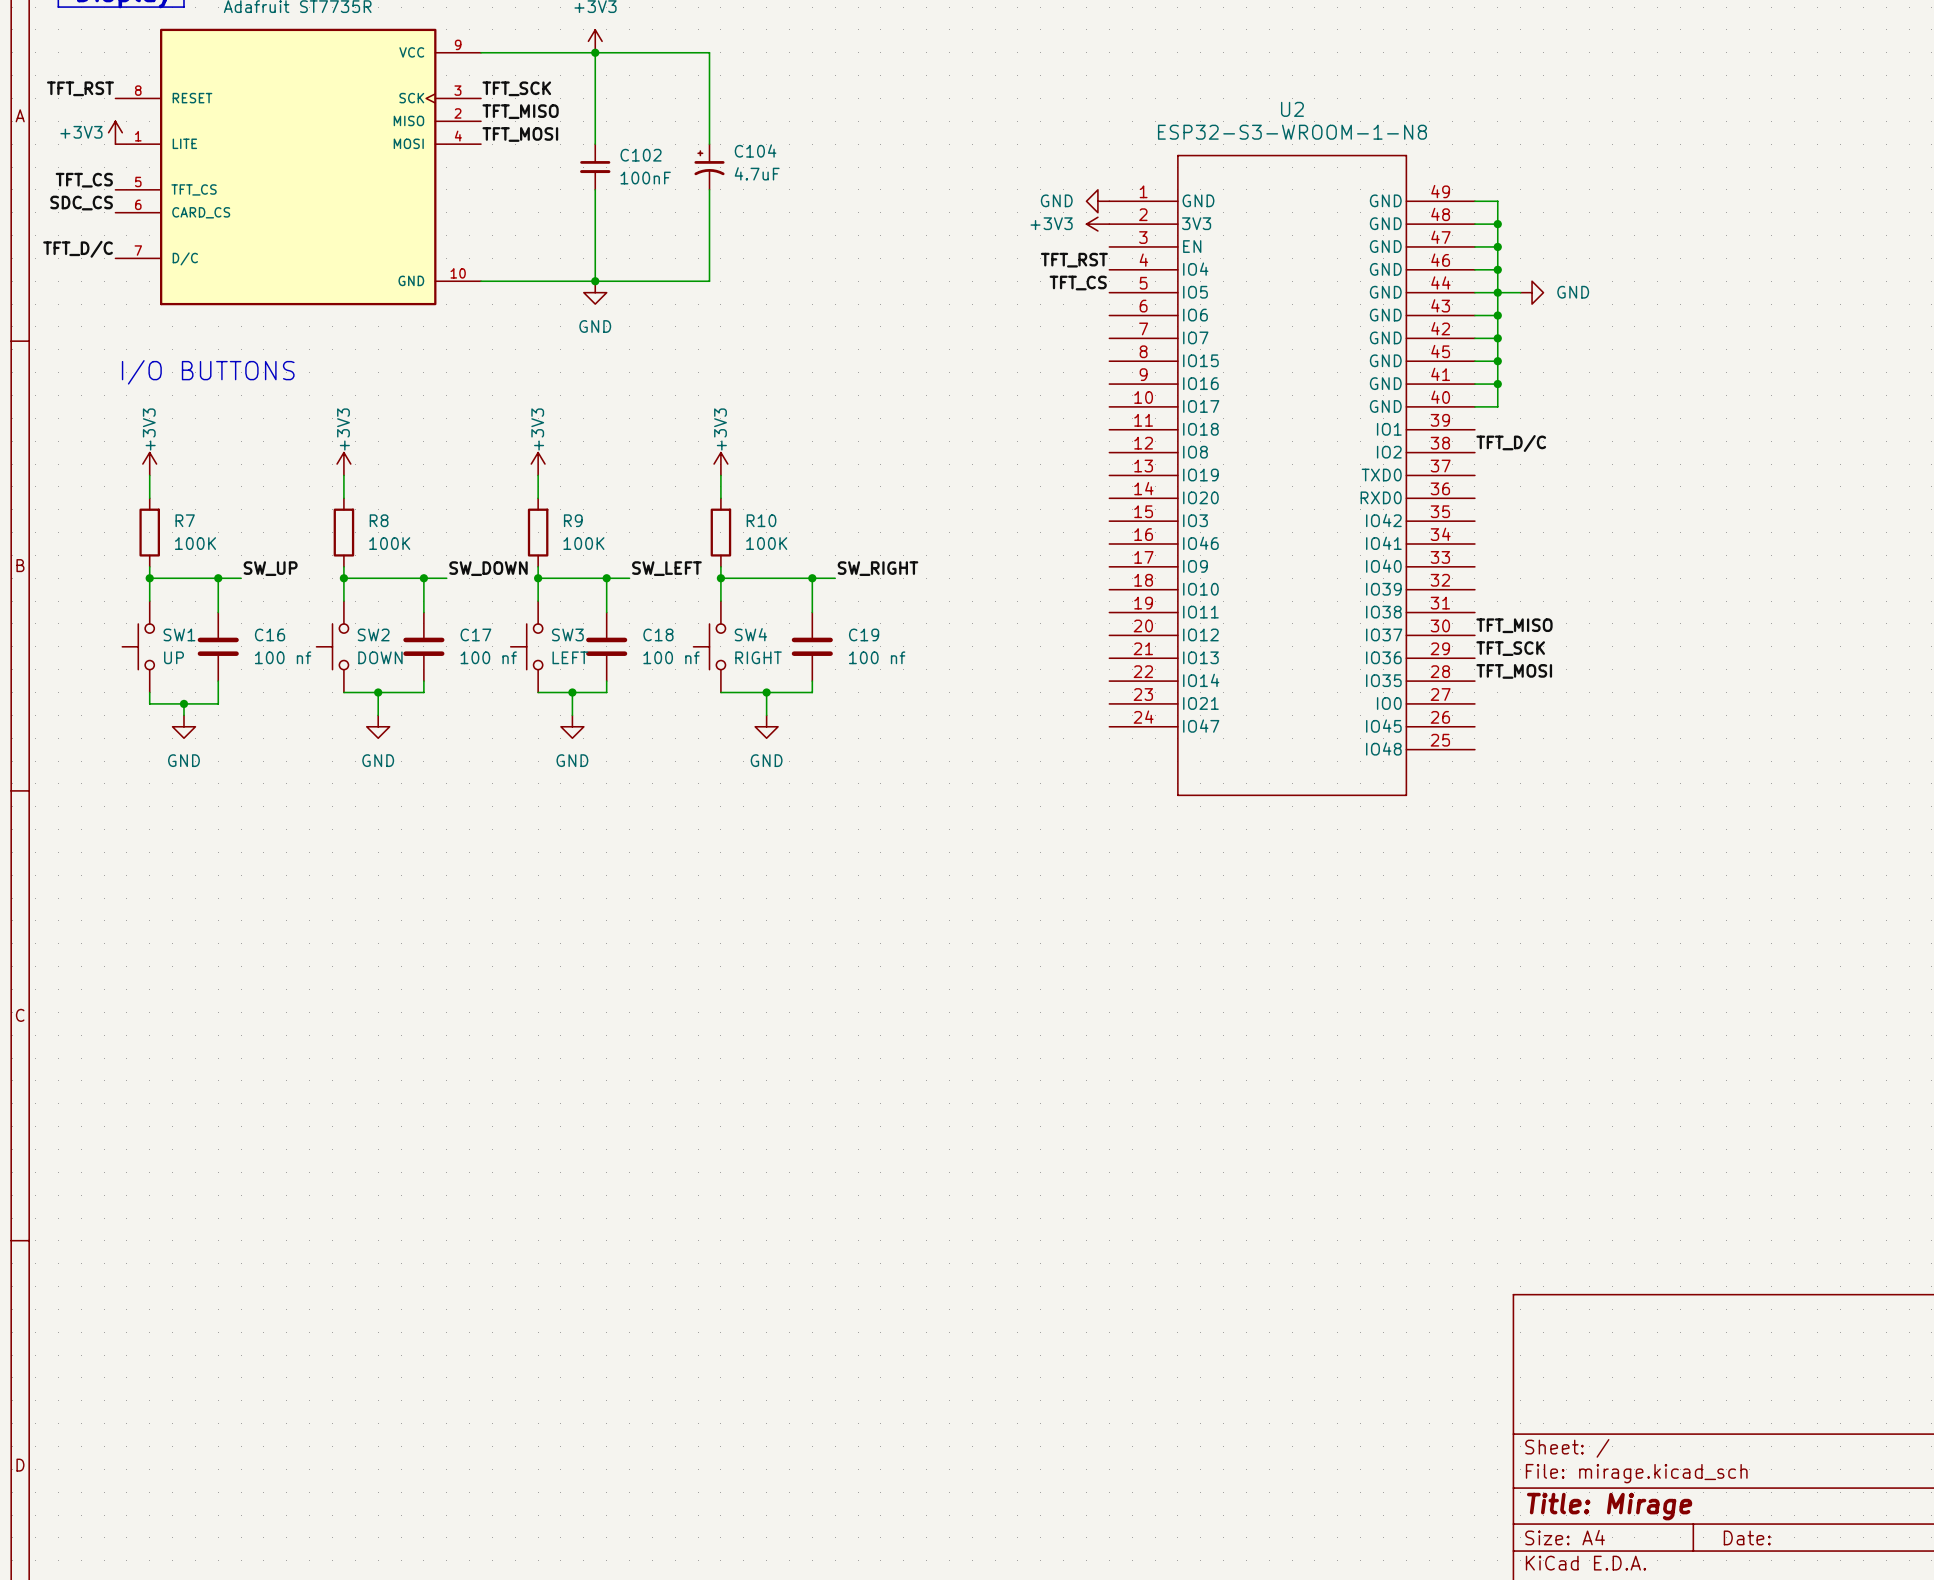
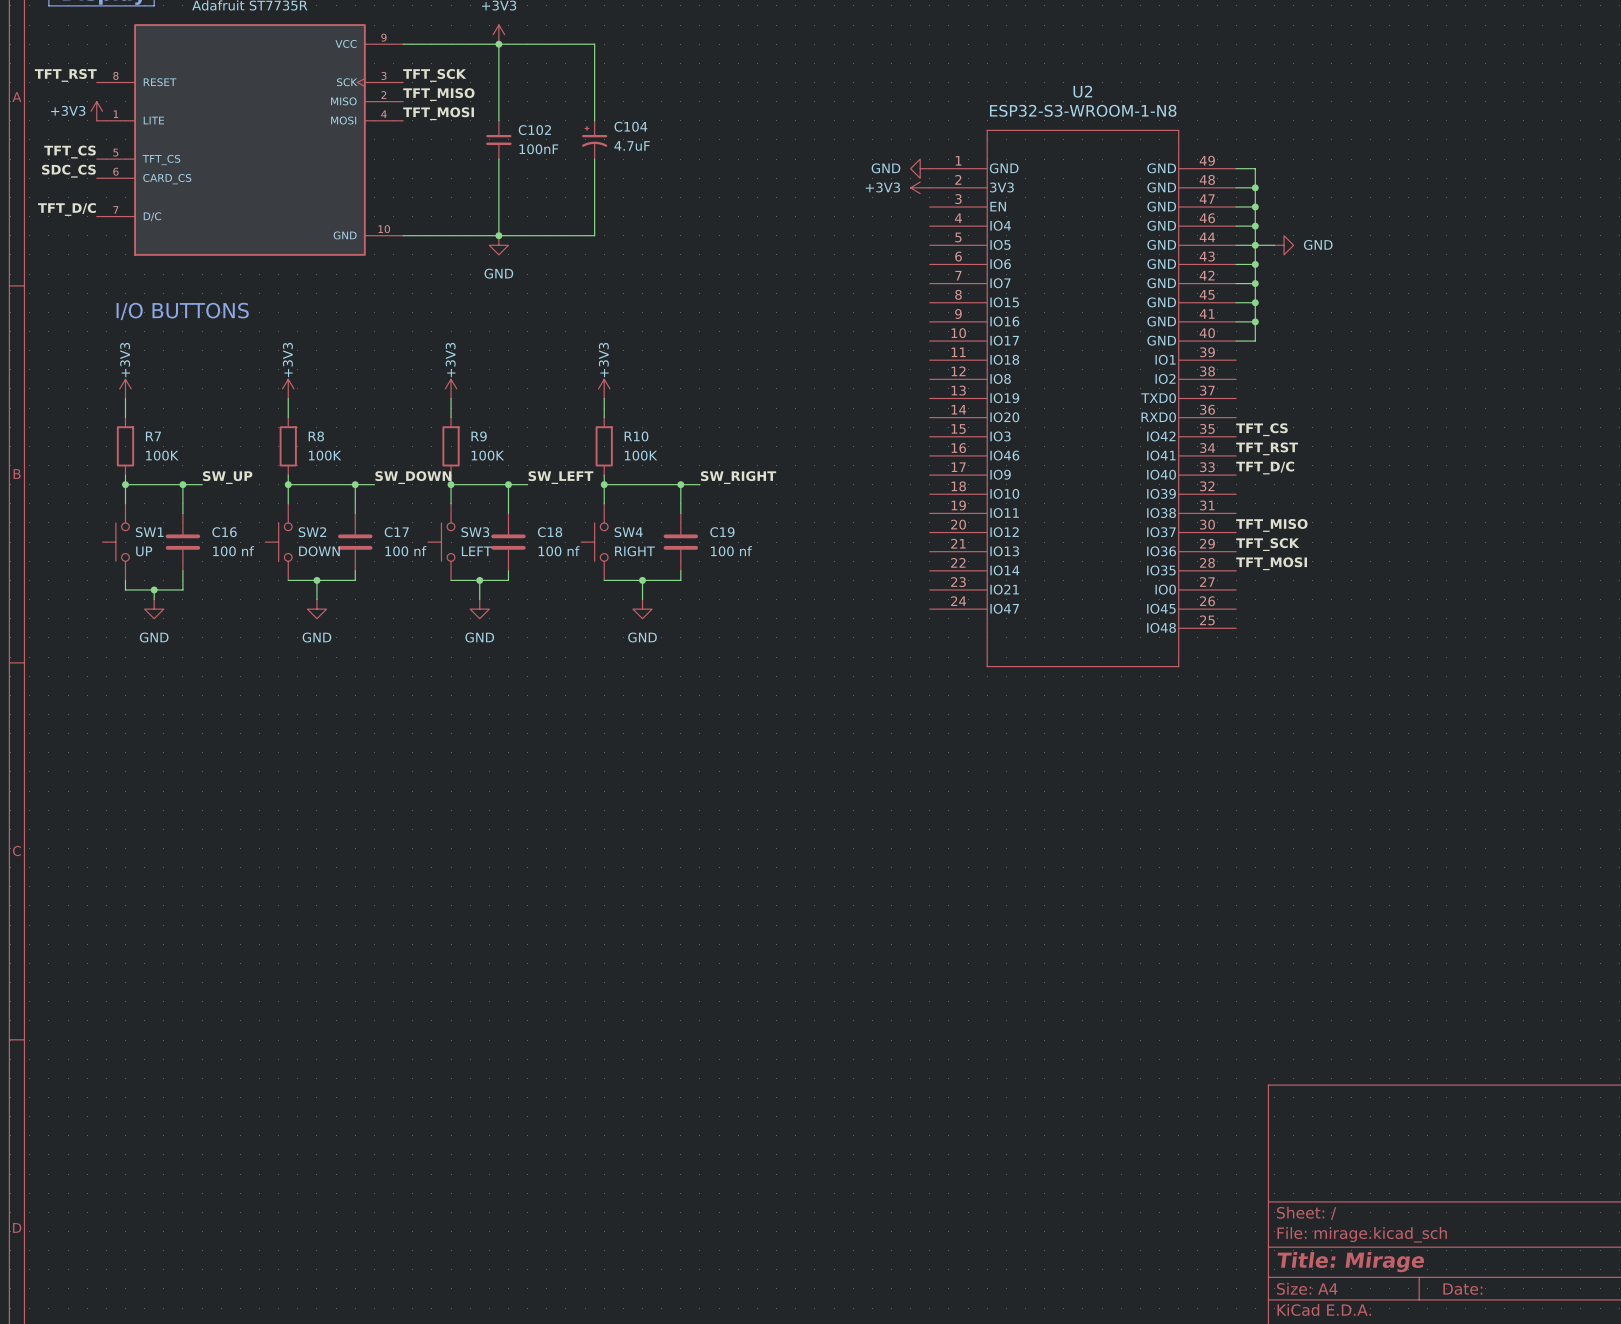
label: TFT_RST (1074, 260) -> none
label: TFT_CS (1078, 283) -> none
label position: TFT_D/C (1511, 443) -> TFT_D/C (1265, 468)
label: none -> TFT_CS (1261, 429)
label: none -> TFT_RST (1267, 448)

